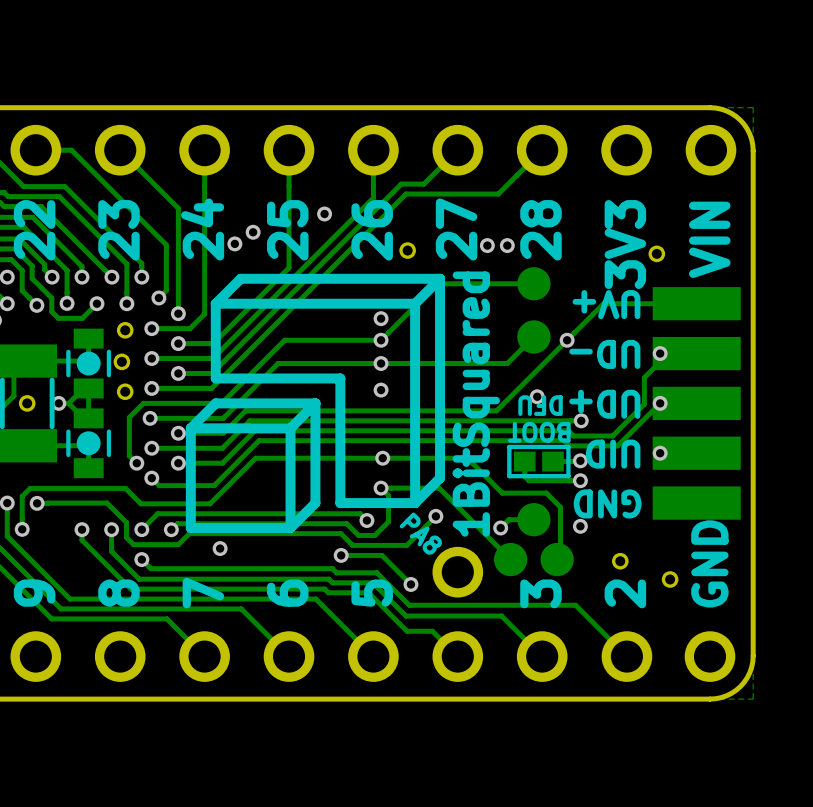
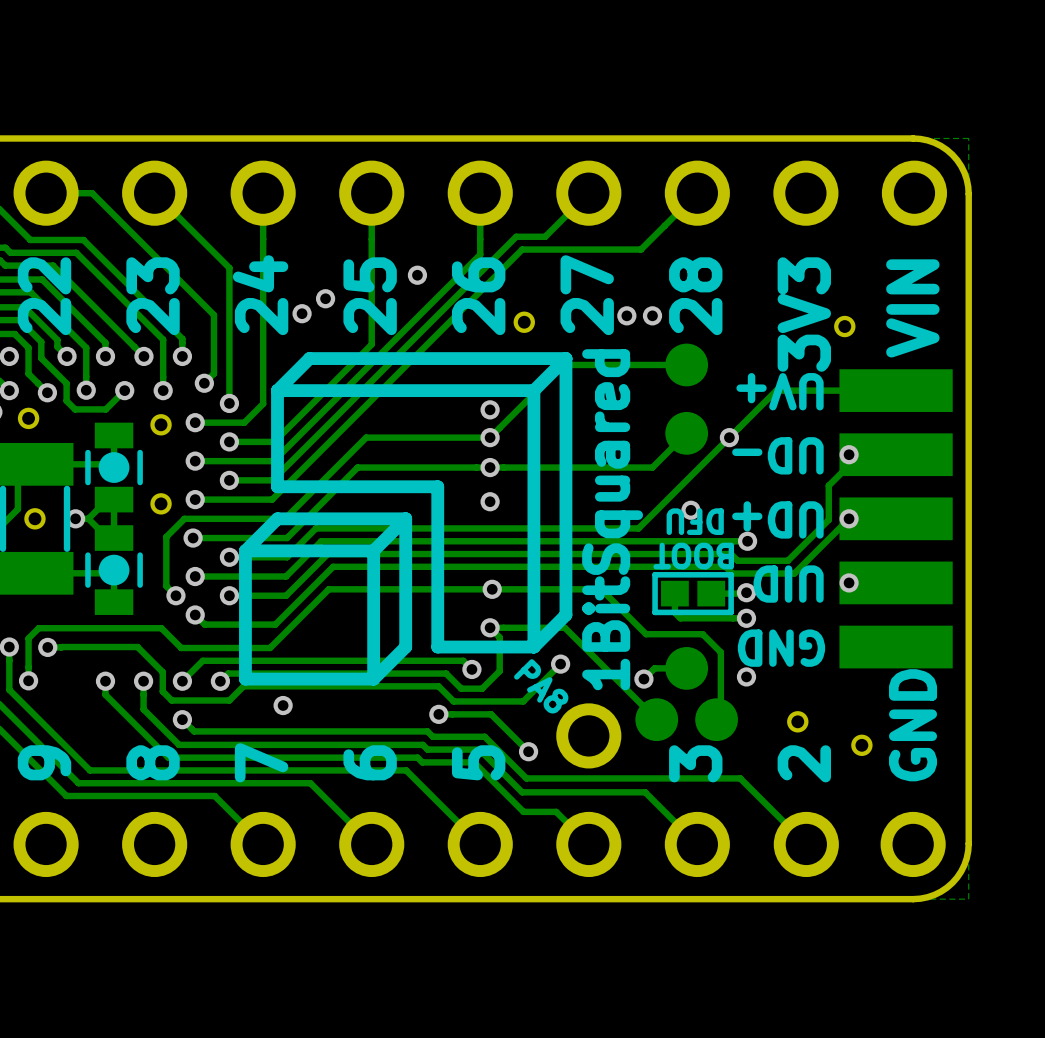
part position: (121, 361) -> (28, 418)

